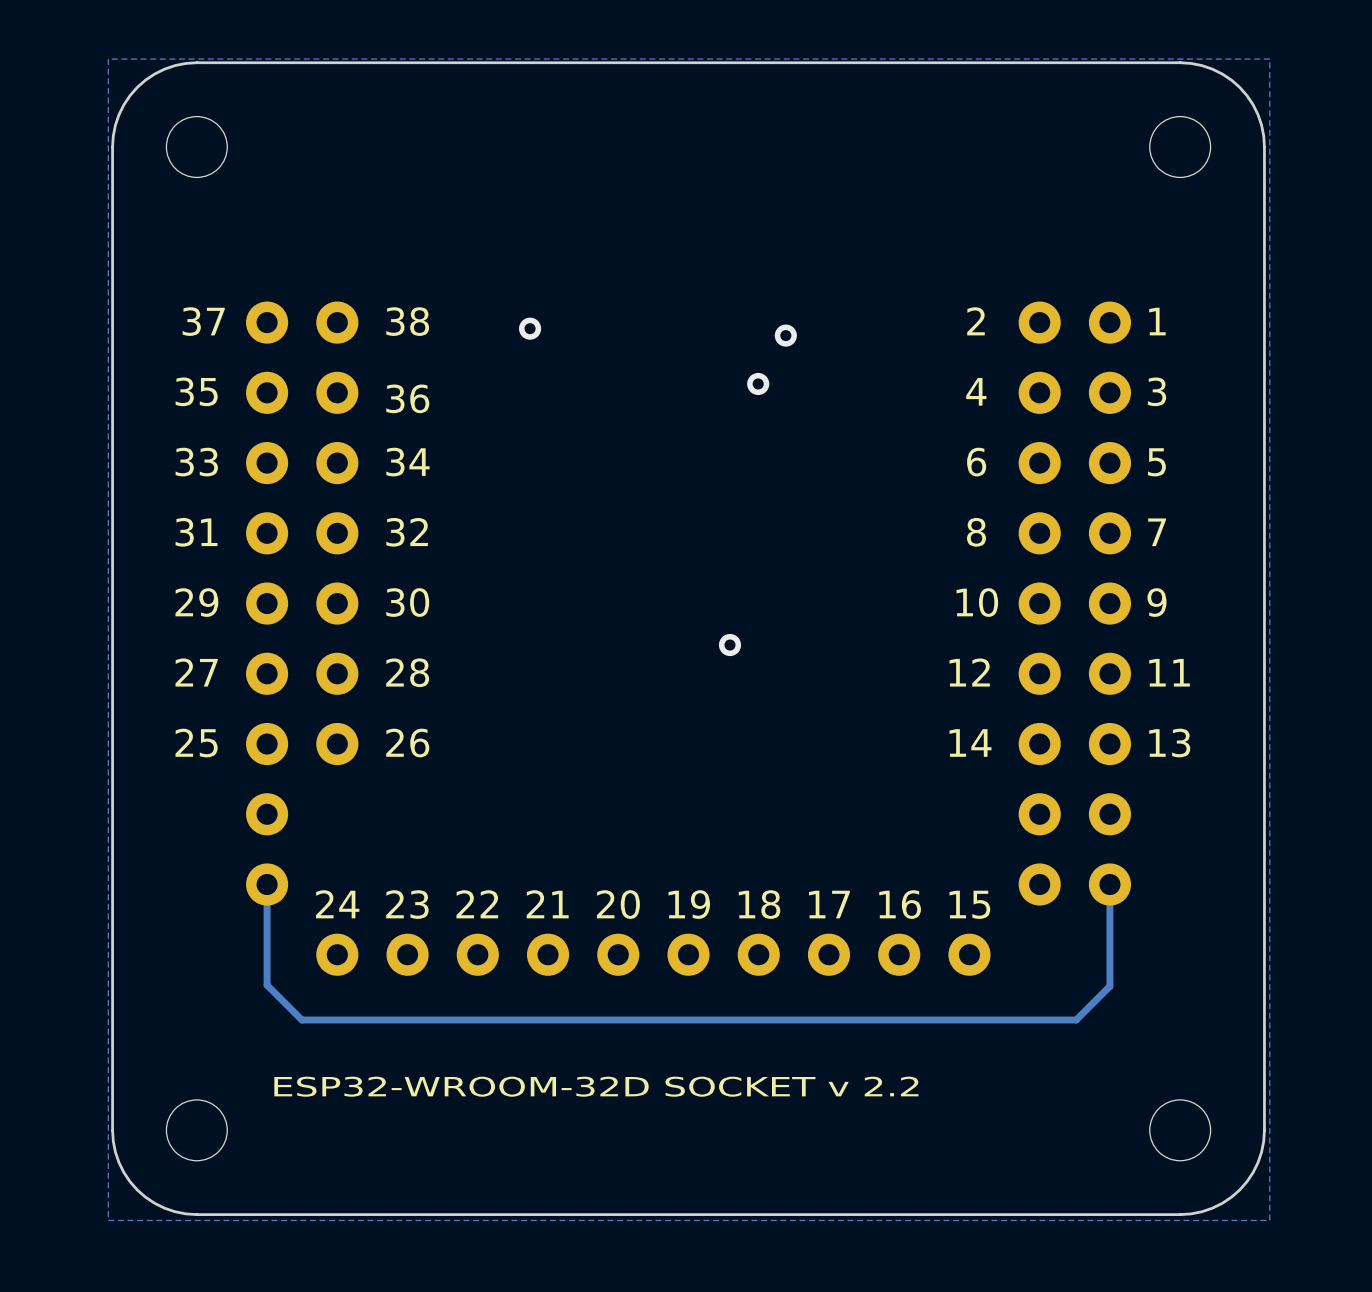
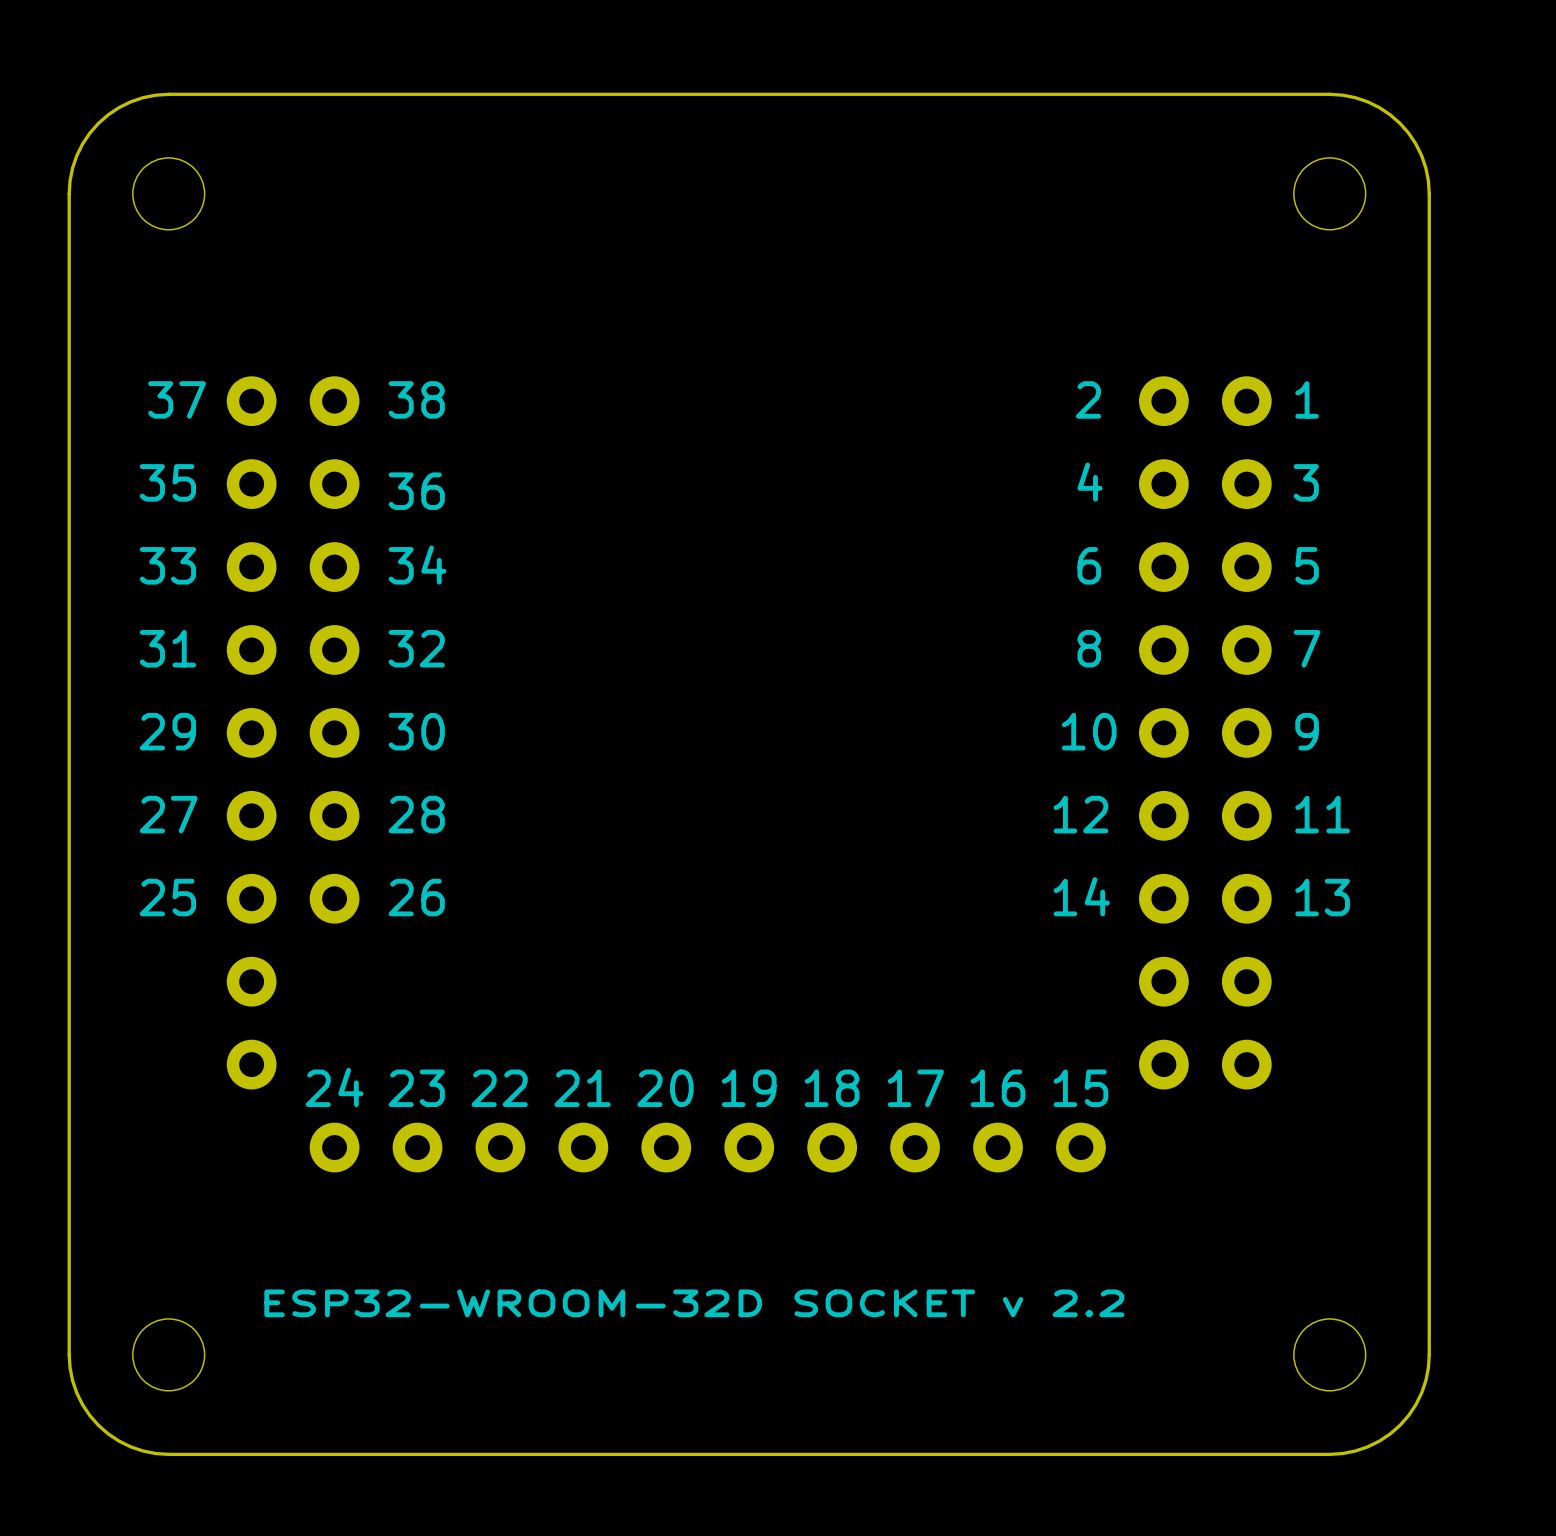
zone outline: (1269, 59) (1269, 1220) (108, 1220) (108, 59) (1269, 59) -> none
via: (530, 328) -> none
via: (785, 335) -> none
via: (758, 383) -> none
via: (729, 645) -> none
track: (1109, 884) (1109, 986) (1076, 1019) (301, 1019) (267, 985) (267, 884) -> none

